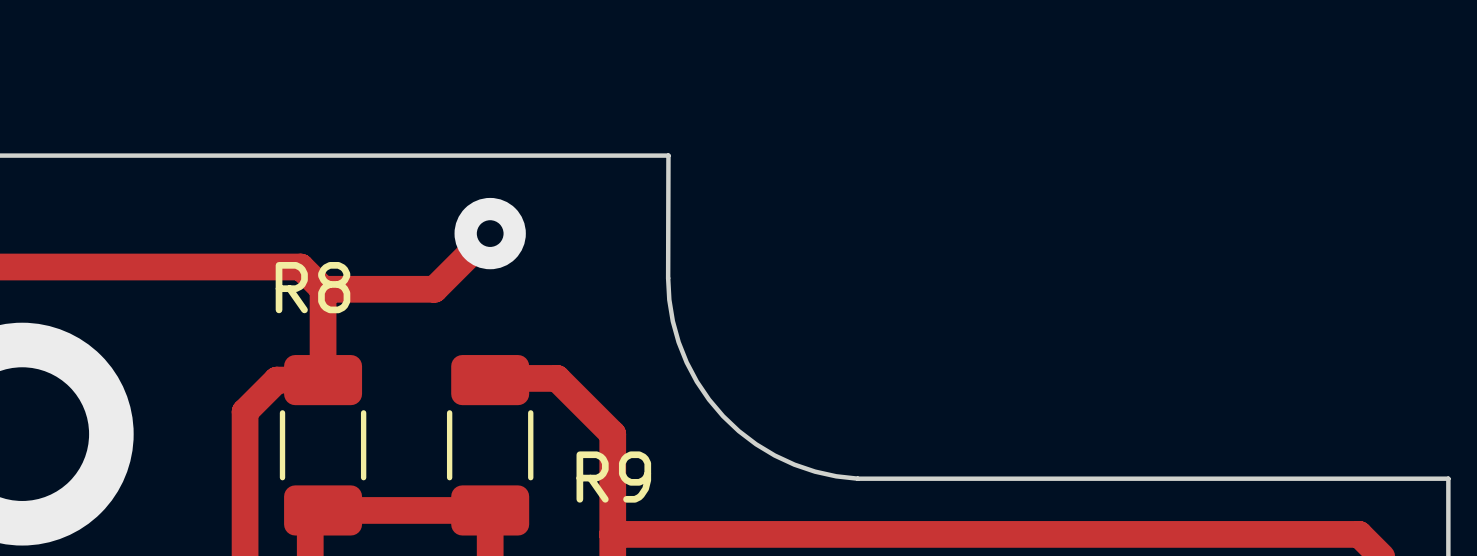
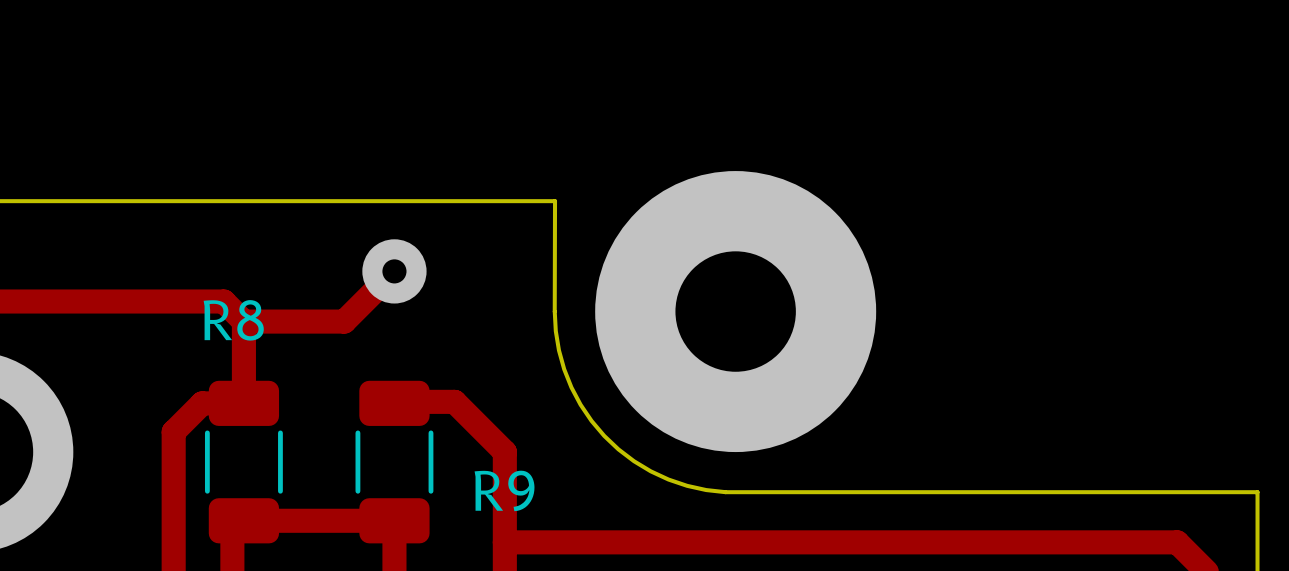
via: none -> (735, 311)

